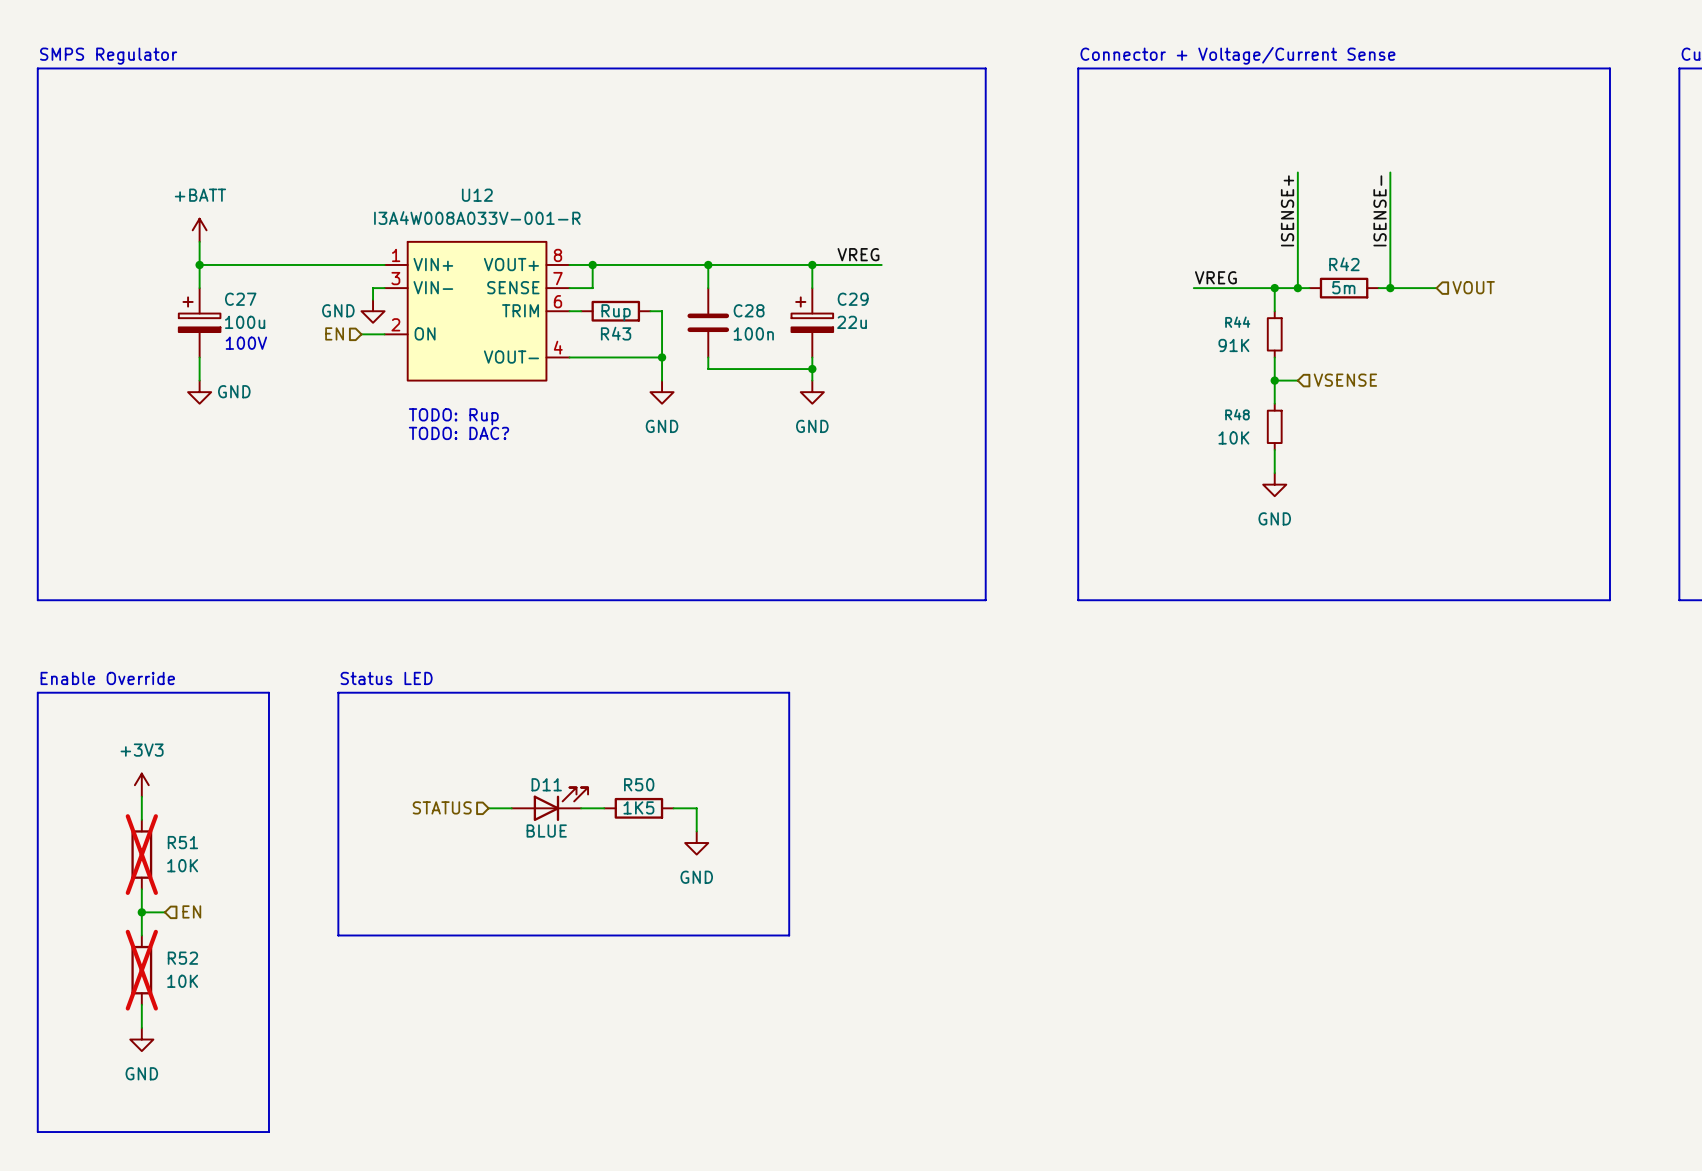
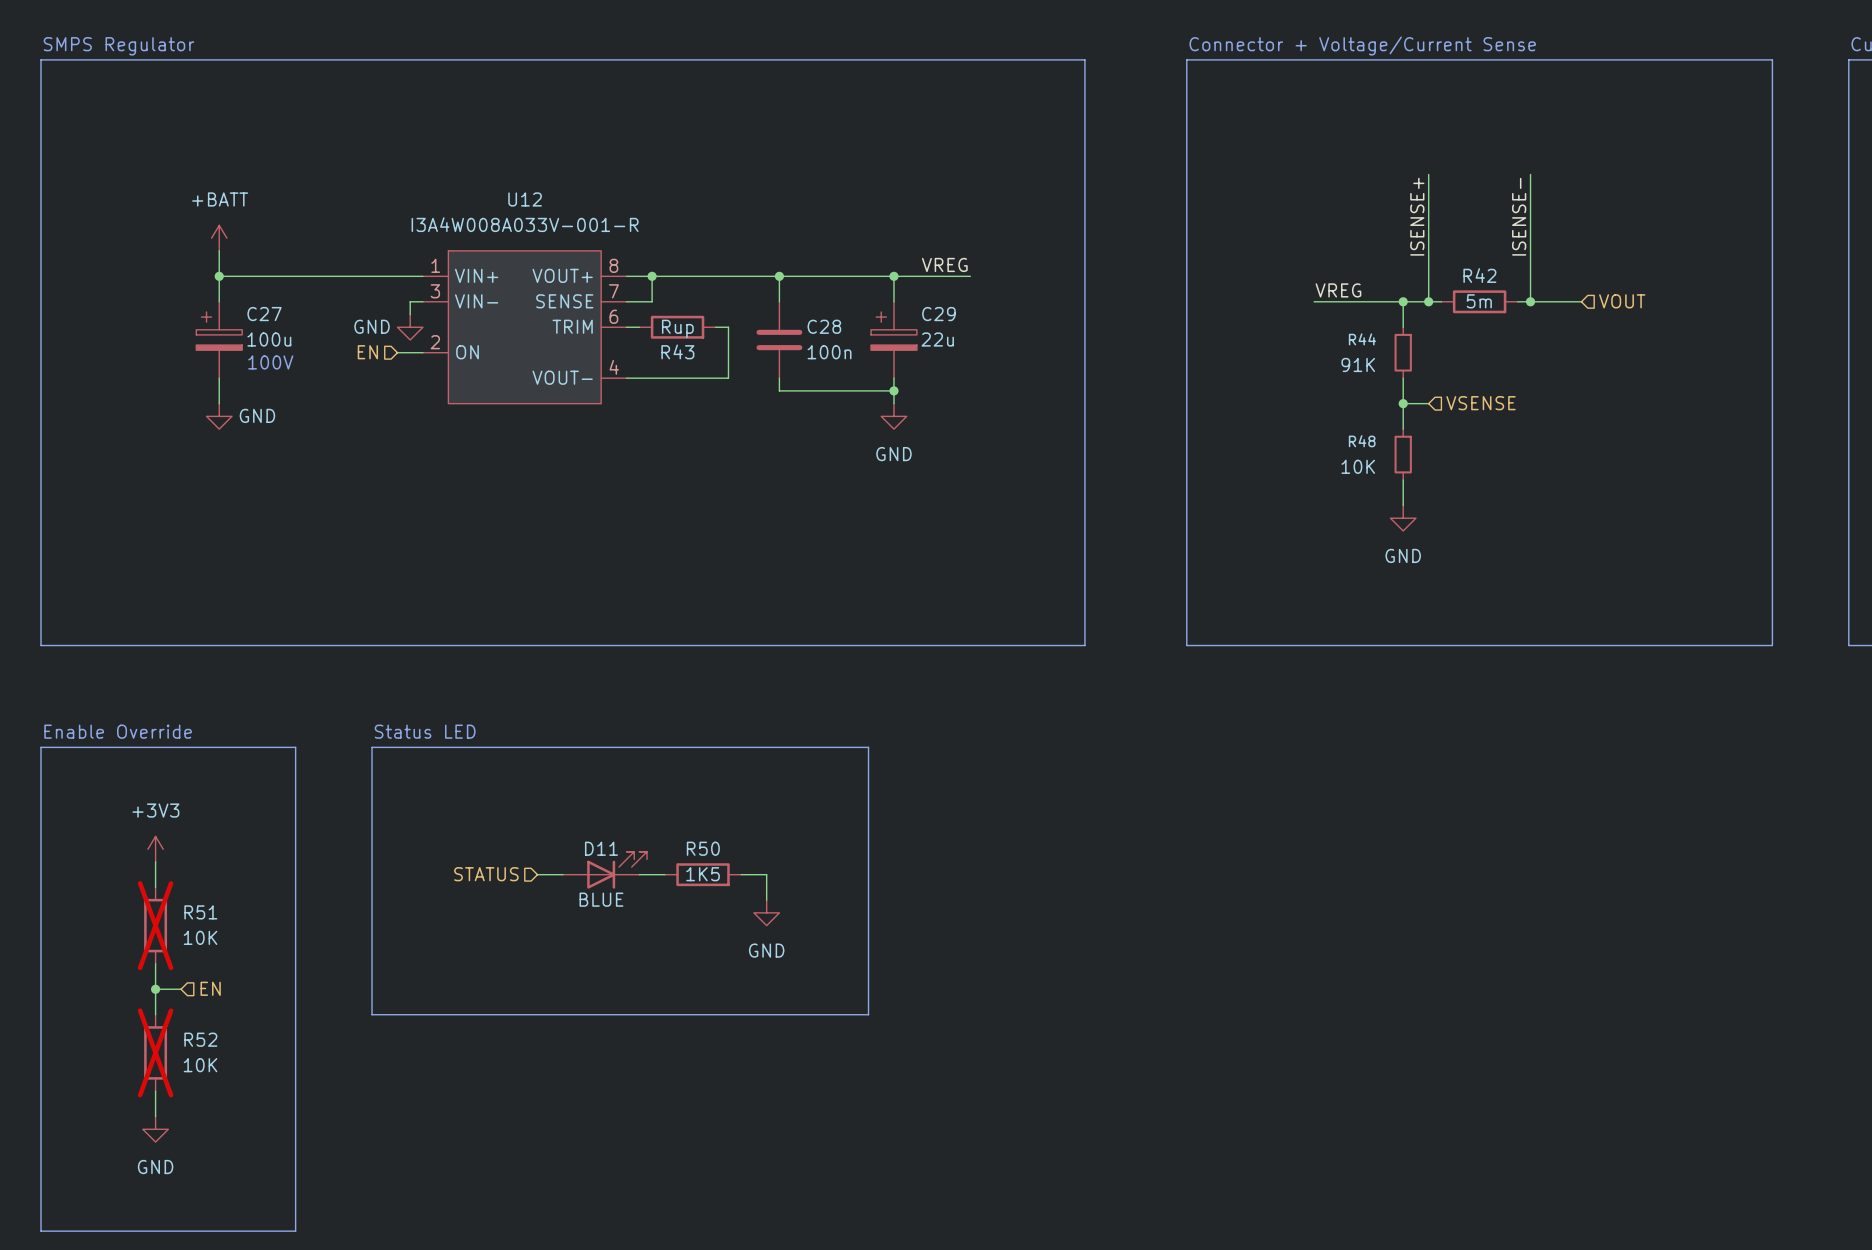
wire: (662, 357) (662, 380) -> none
junction: (662, 357) -> none
power symbol: GND (662, 392) -> none
text: TODO: Rup (453, 416) -> none
text: TODO: DAC? (458, 433) -> none

